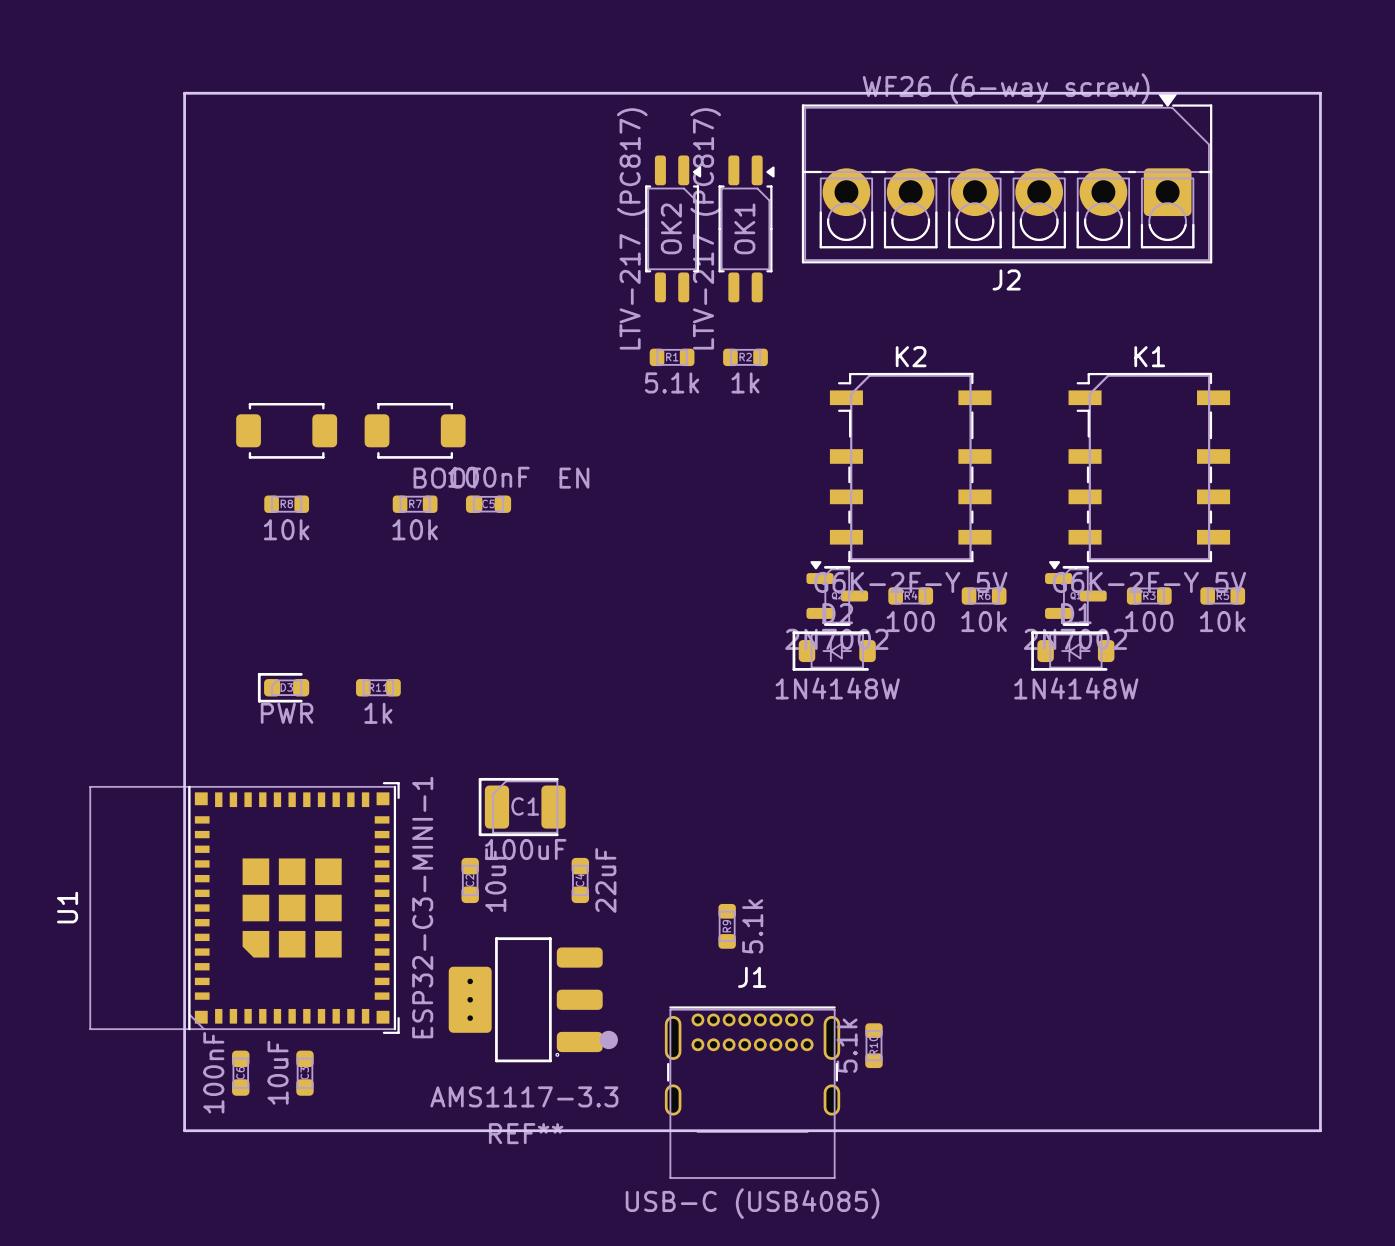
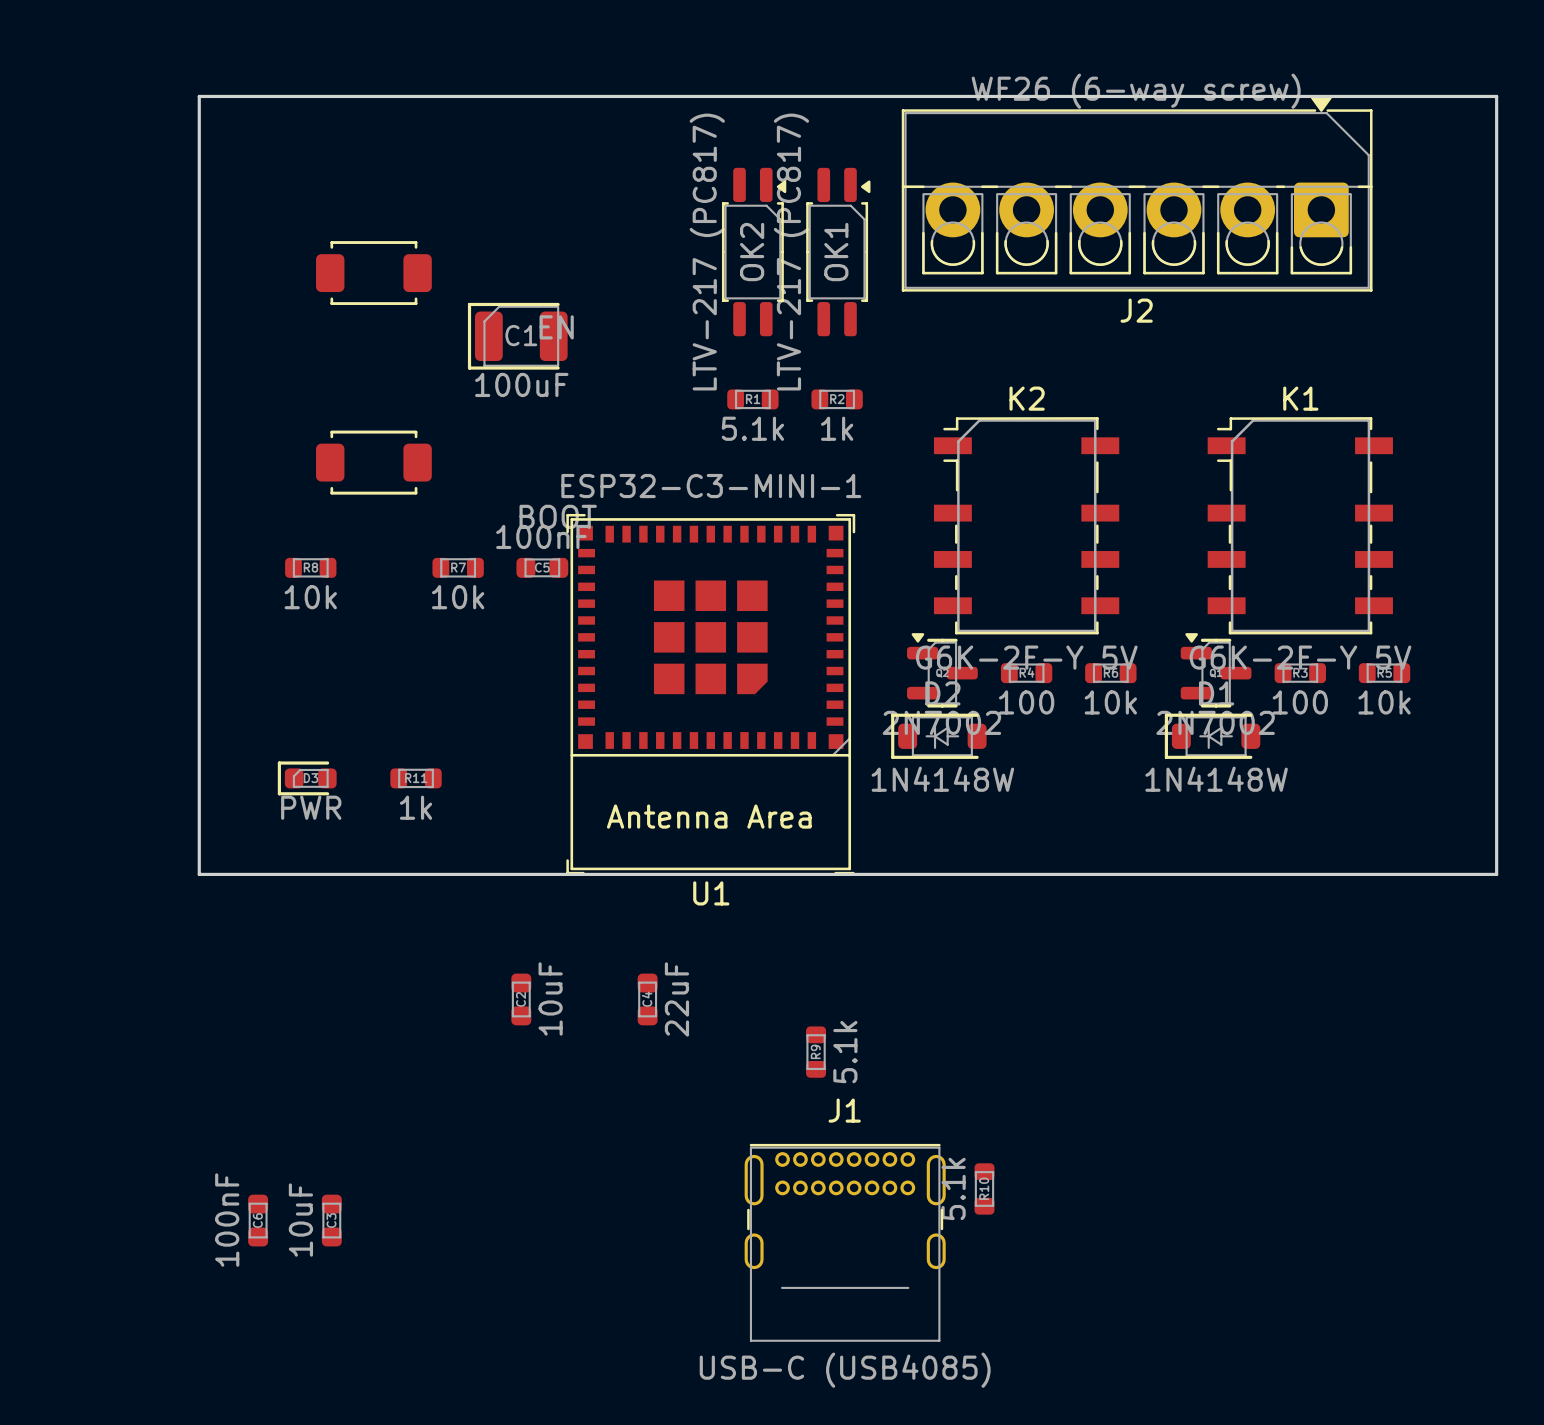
board edge: (189, 93) (184, 93) (184, 1130) (1320, 1130) (1320, 771) -> (199, 96) (199, 874) (1496, 874)
part position: (286, 430) -> (373, 462)
part position: (415, 430) -> (373, 273)
U1 footprint: [89, 782, 400, 1034] -> [566, 513, 856, 875]
C1 position: (522, 807) -> (517, 336)
U1 name position: U1 (67, 907) -> U1 (711, 893)
U1 value position: ESP32-C3-MINI-1 (422, 907) -> ESP32-C3-MINI-1 (711, 486)
part: AMS1117-3.3 (533, 999) -> none

